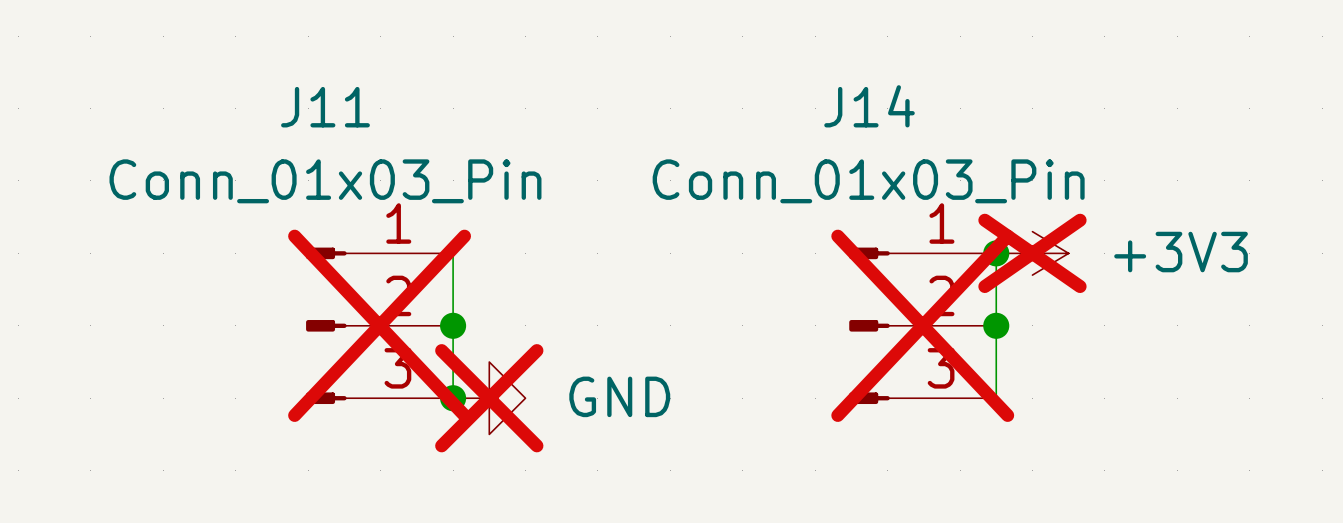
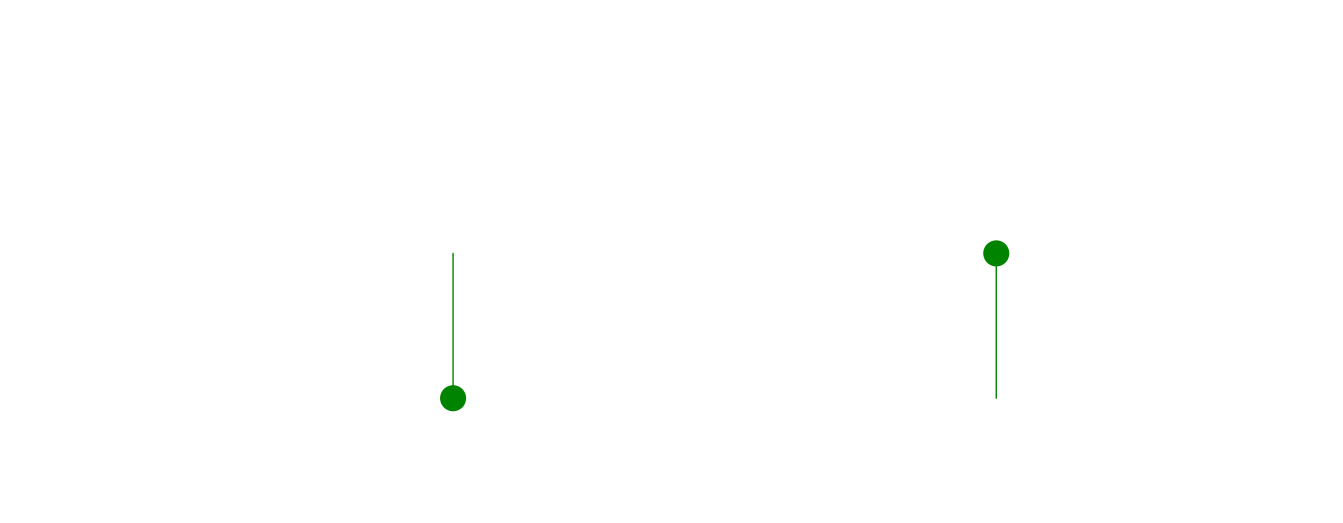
power symbol: +3V3 (1032, 253) -> none
J11: Conn_01x03_Pin (379, 325) -> none
junction: (453, 325) -> none
J14: Conn_01x03_Pin (922, 325) -> none
junction: (996, 325) -> none
power symbol: GND (489, 398) -> none

